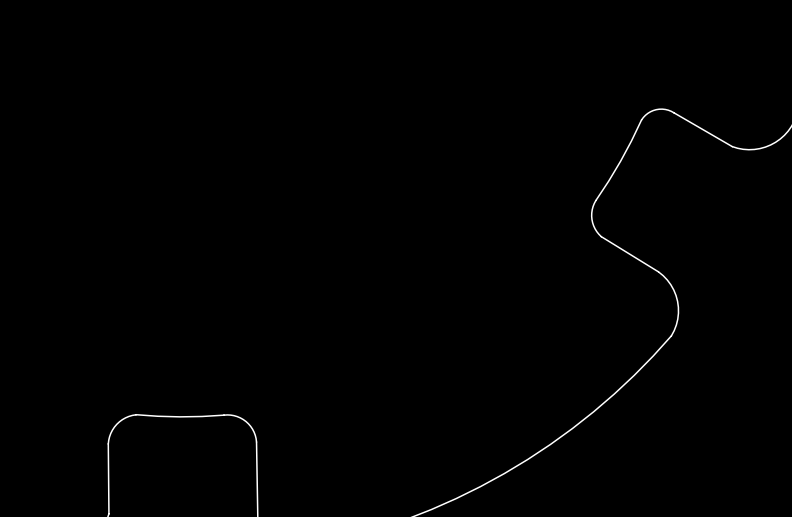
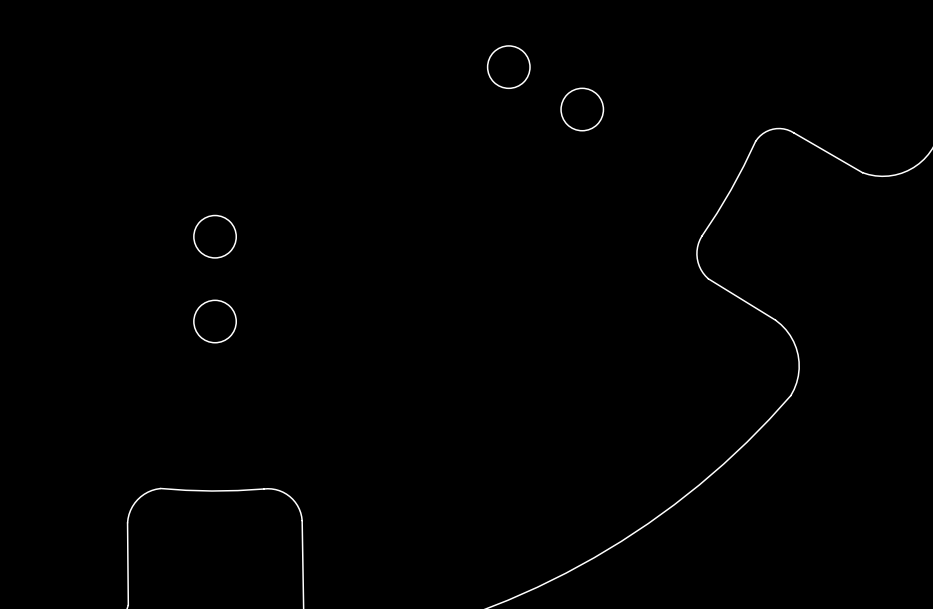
round board edge: none -> [487, 45, 531, 89]
round board edge: none -> [560, 87, 604, 132]
round board edge: none -> [193, 215, 237, 259]
round board edge: none -> [193, 299, 237, 344]

